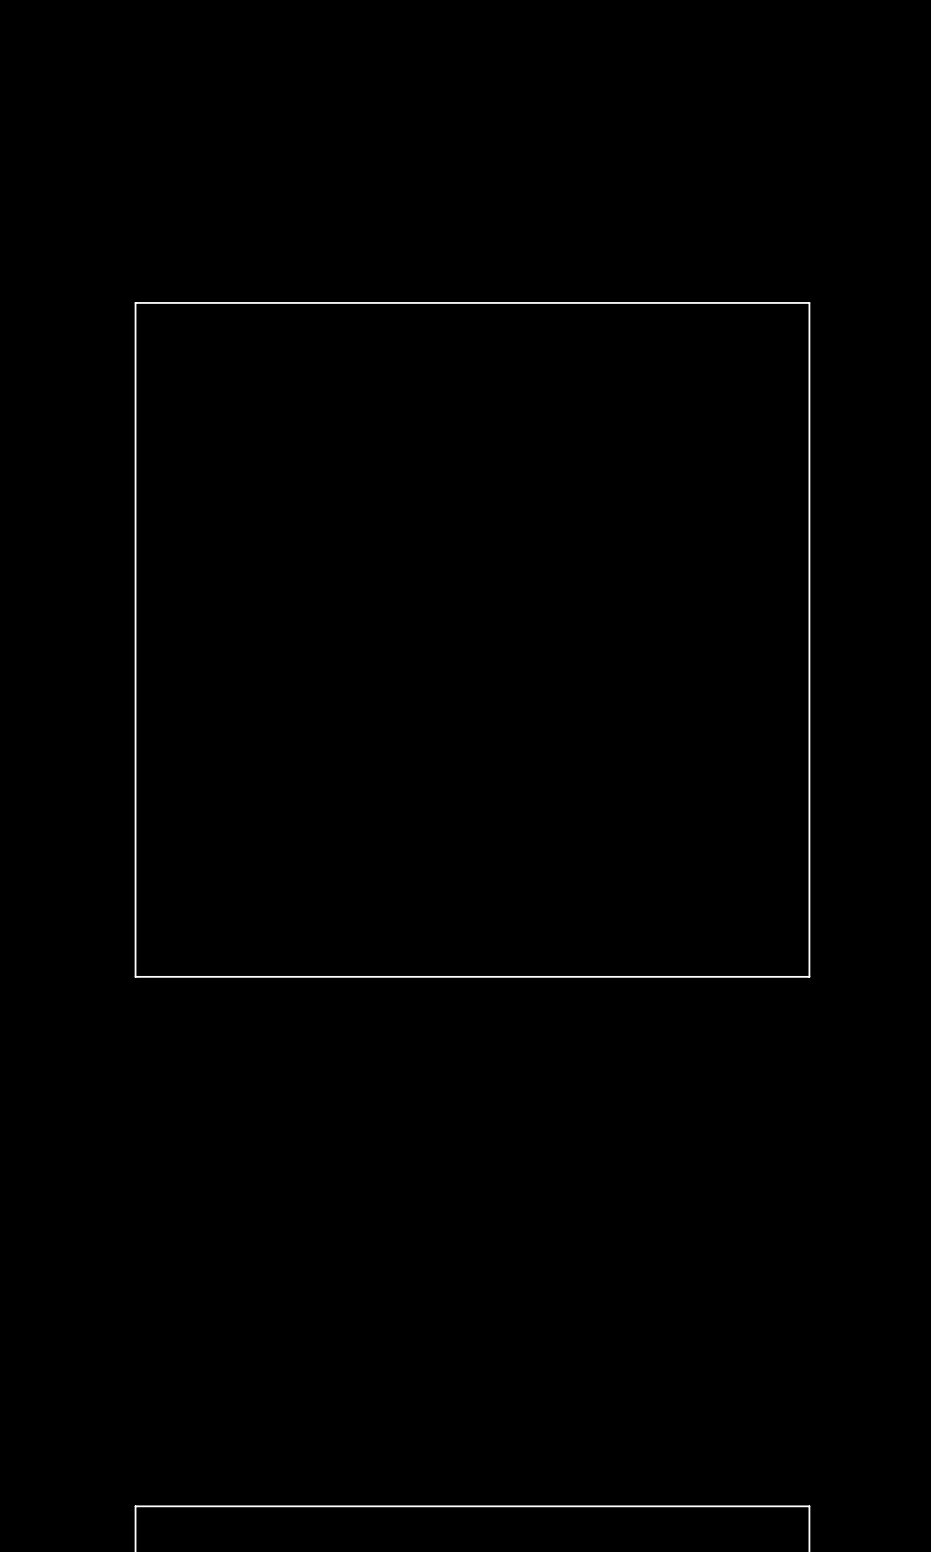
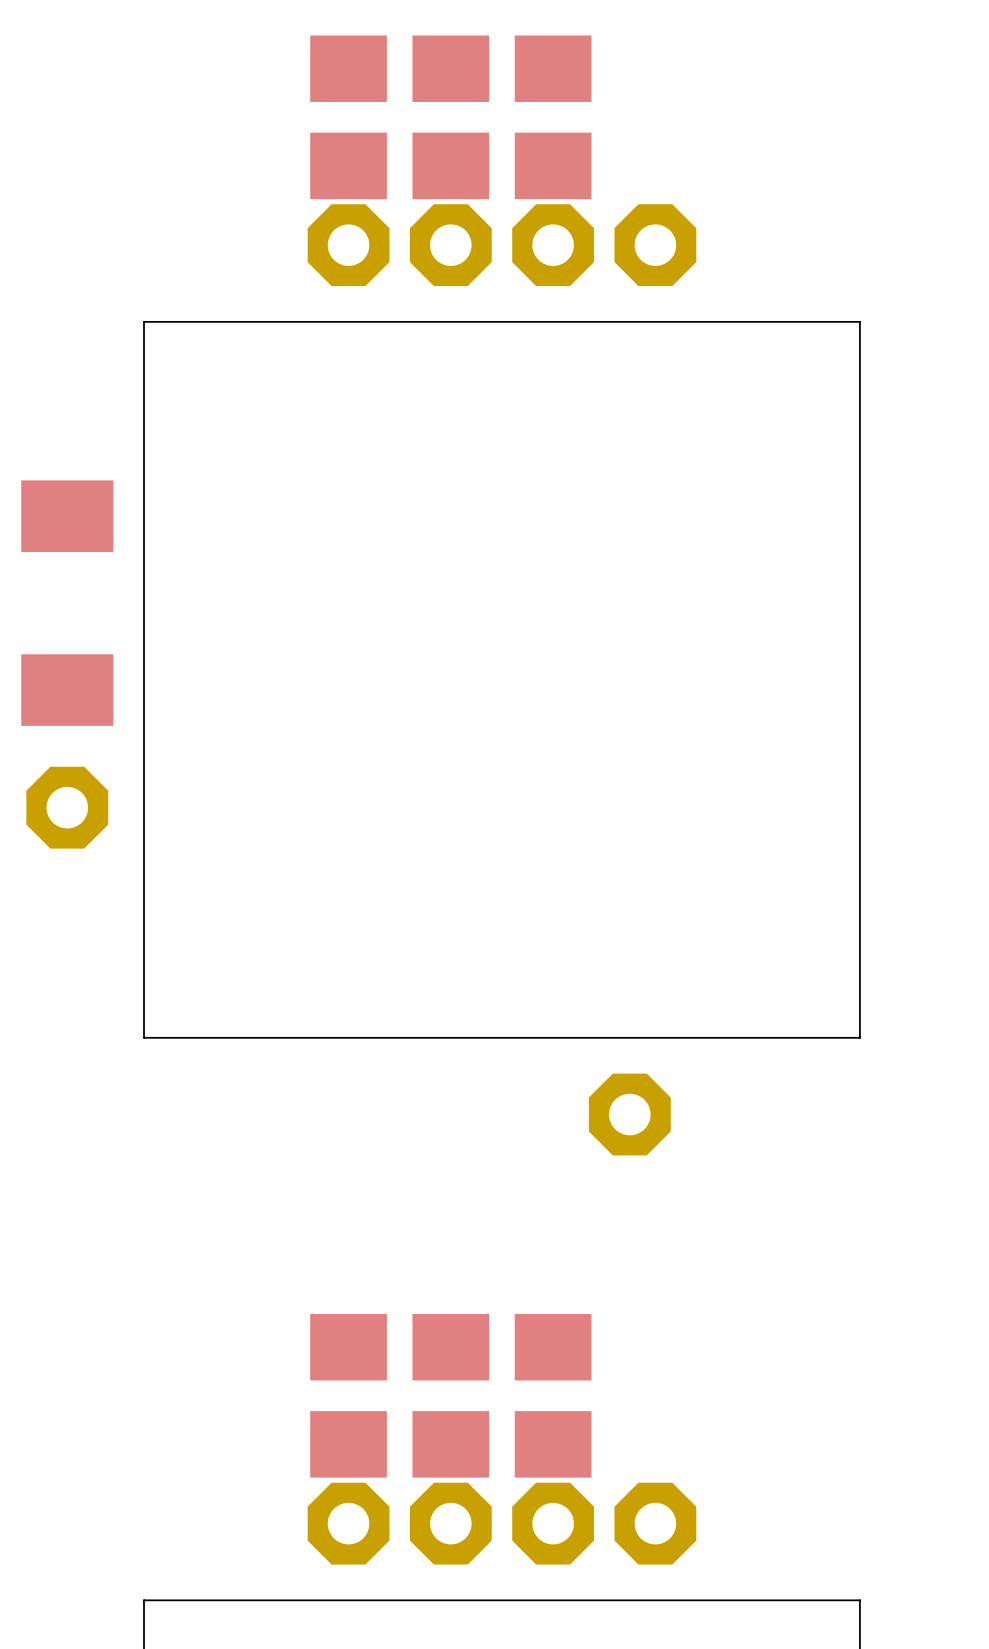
part: none -> (348, 117)
part: none -> (450, 117)
part: none -> (553, 117)
part: none -> (348, 245)
part: none -> (450, 245)
part: none -> (553, 245)
part: none -> (655, 245)
part: none -> (67, 603)
part: none -> (67, 807)
part: none -> (629, 1114)
part: none -> (348, 1395)
part: none -> (450, 1395)
part: none -> (553, 1395)
part: none -> (348, 1523)
part: none -> (450, 1523)
part: none -> (553, 1523)
part: none -> (655, 1523)

